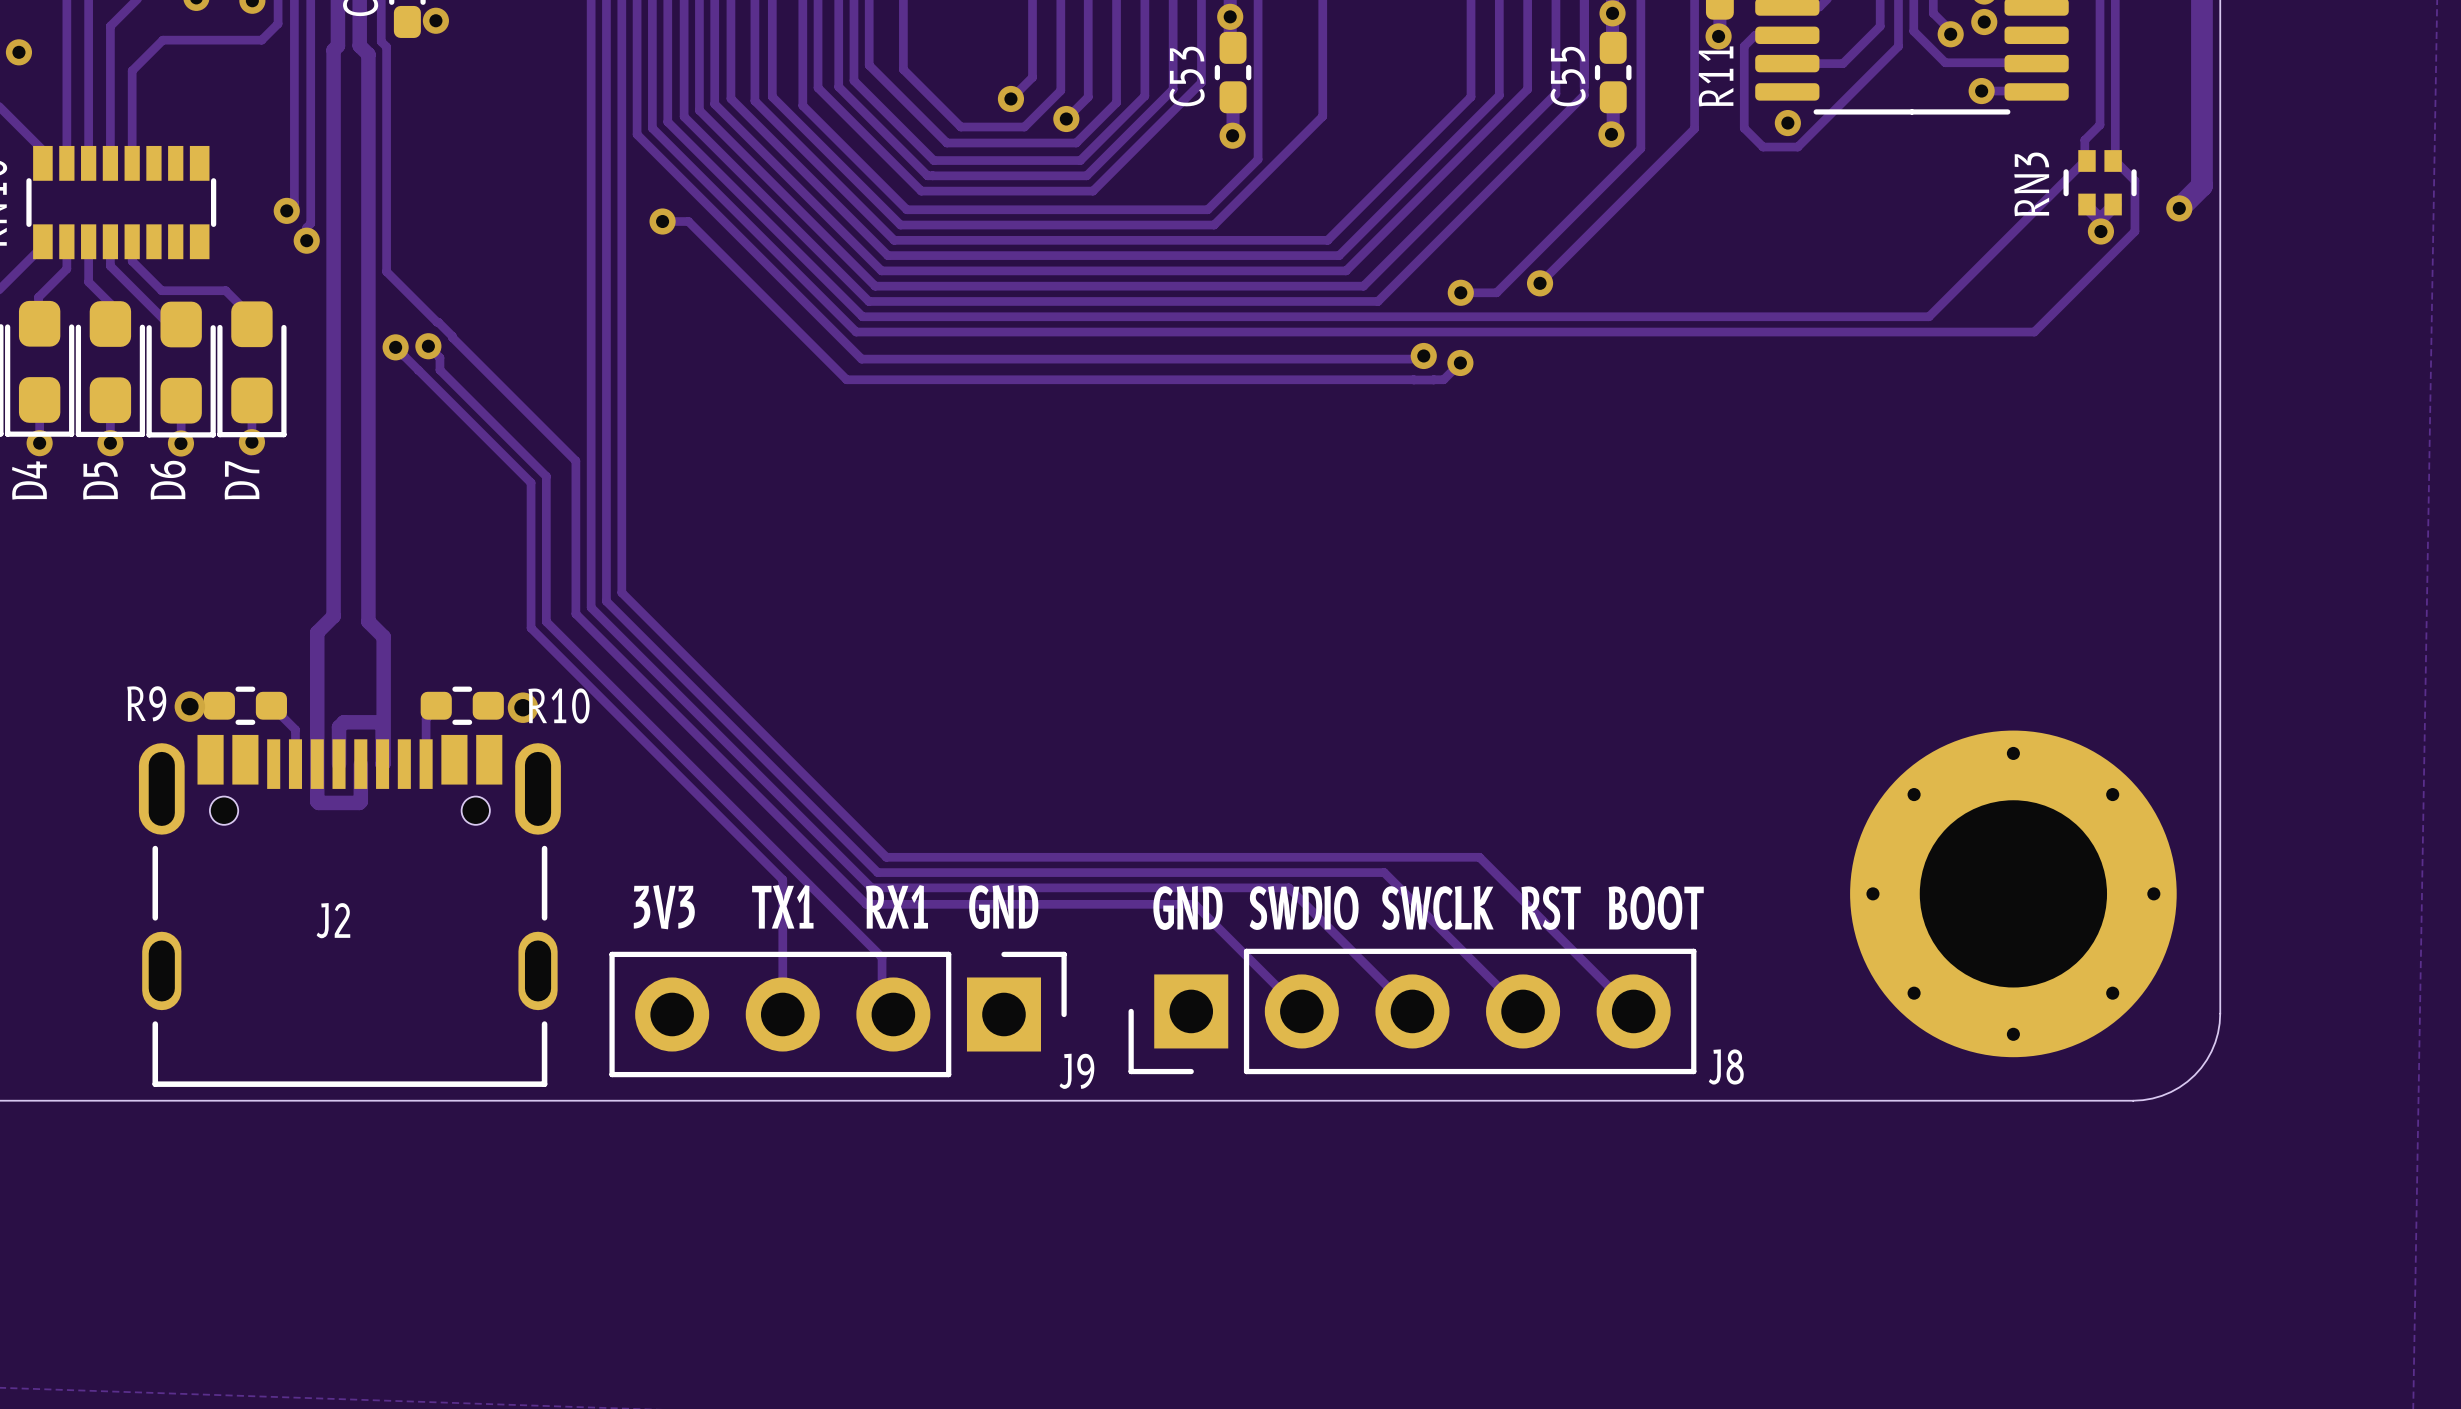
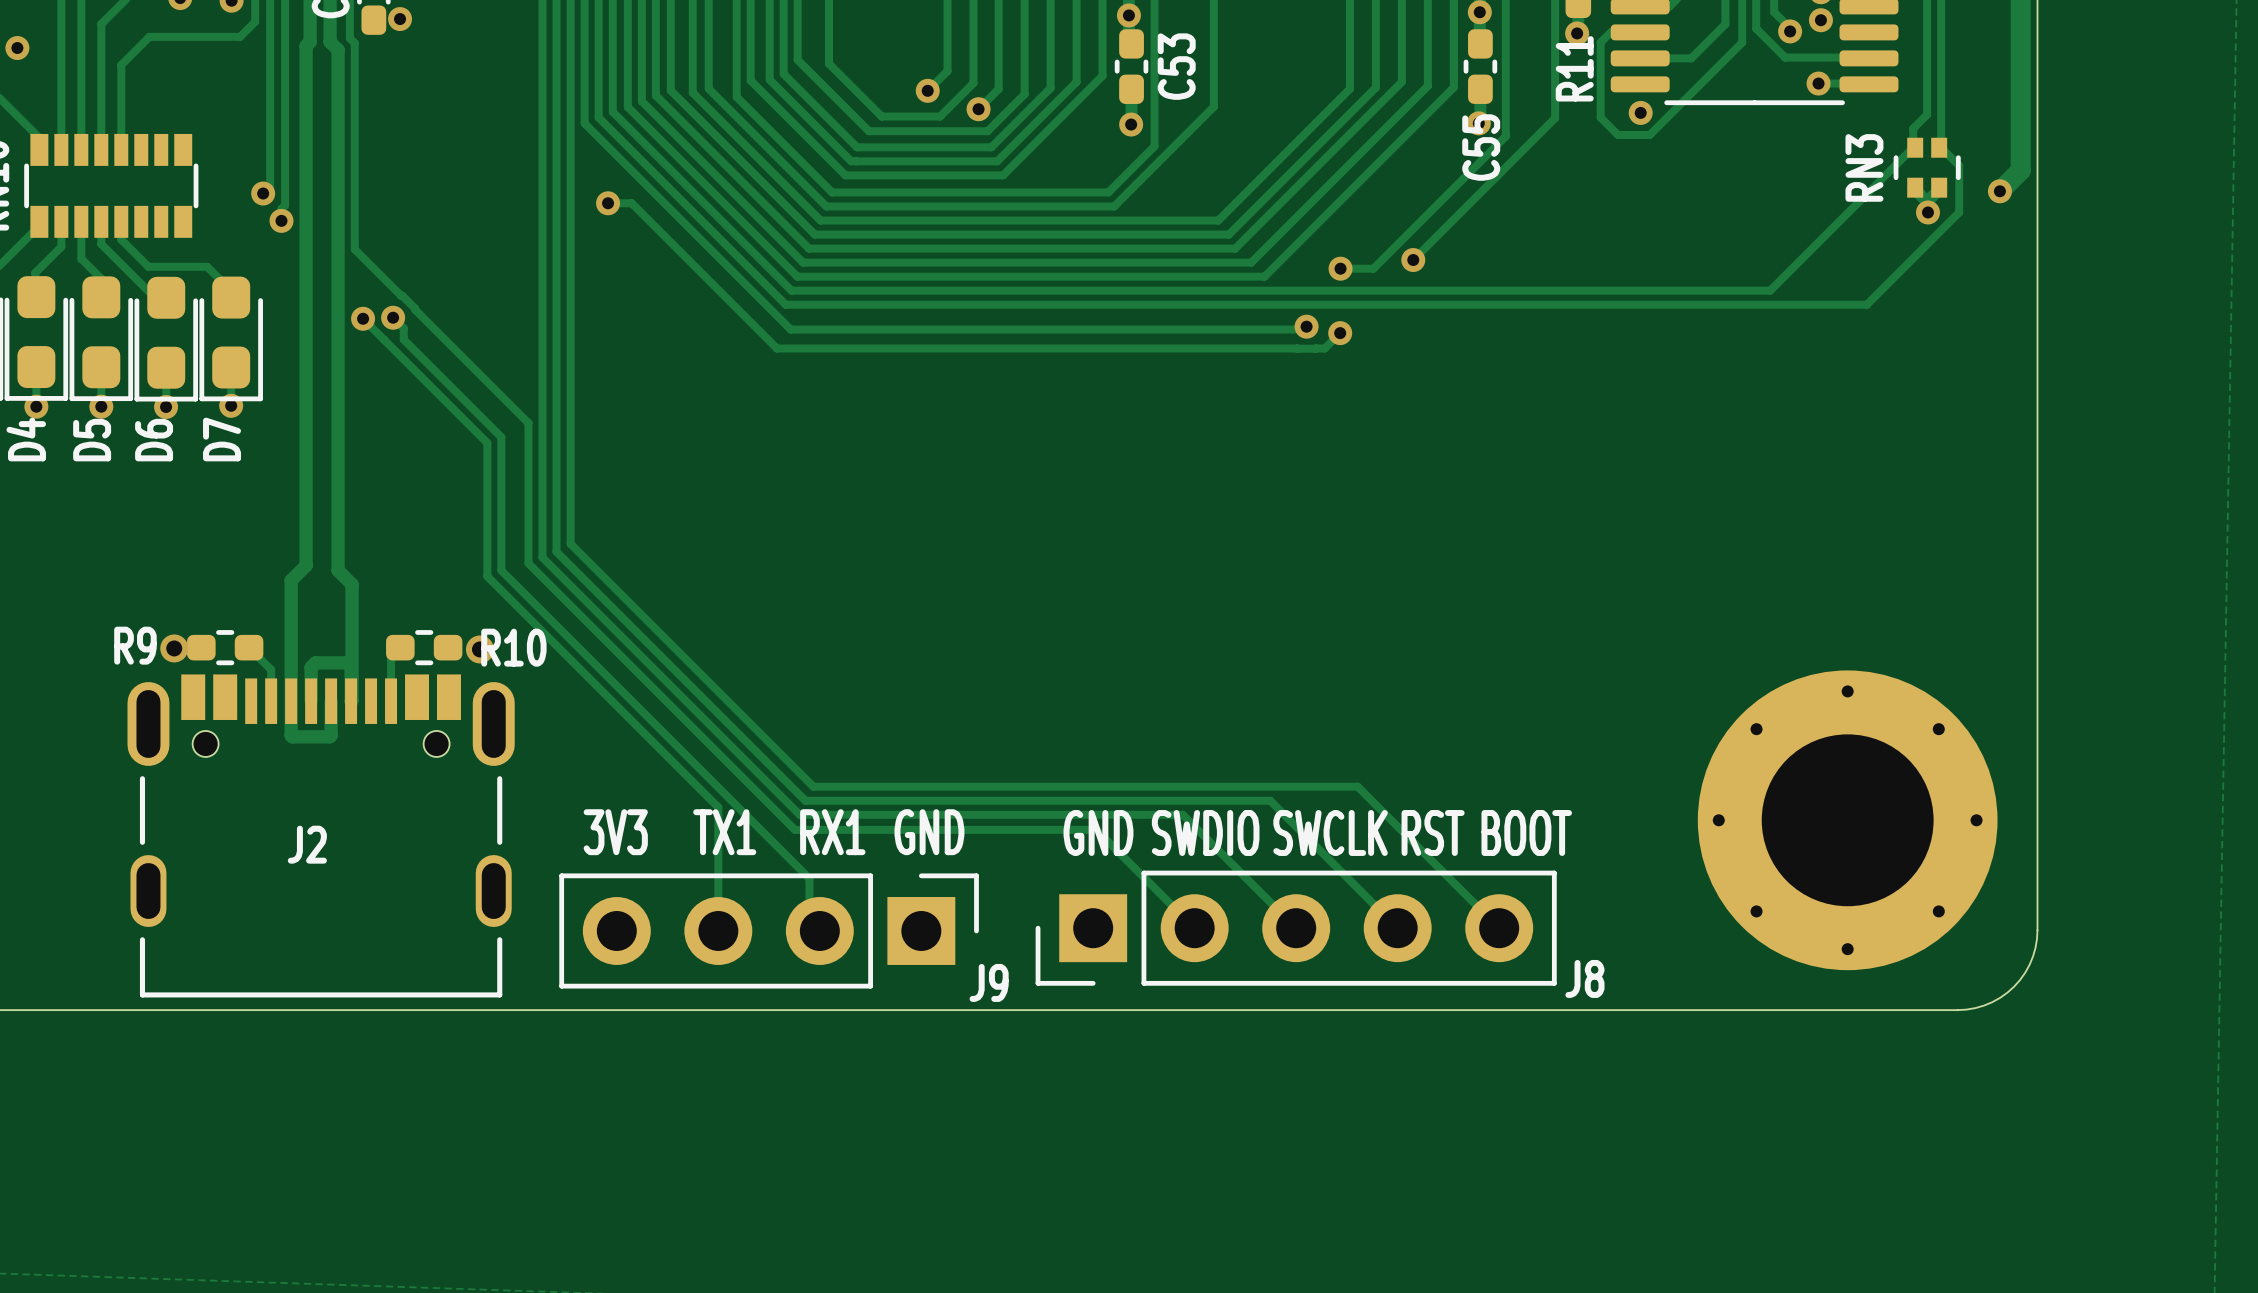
C53 name position: C53 (1187, 76) -> C53 (1176, 66)
C55 name position: C55 (1568, 76) -> C55 (1481, 147)

